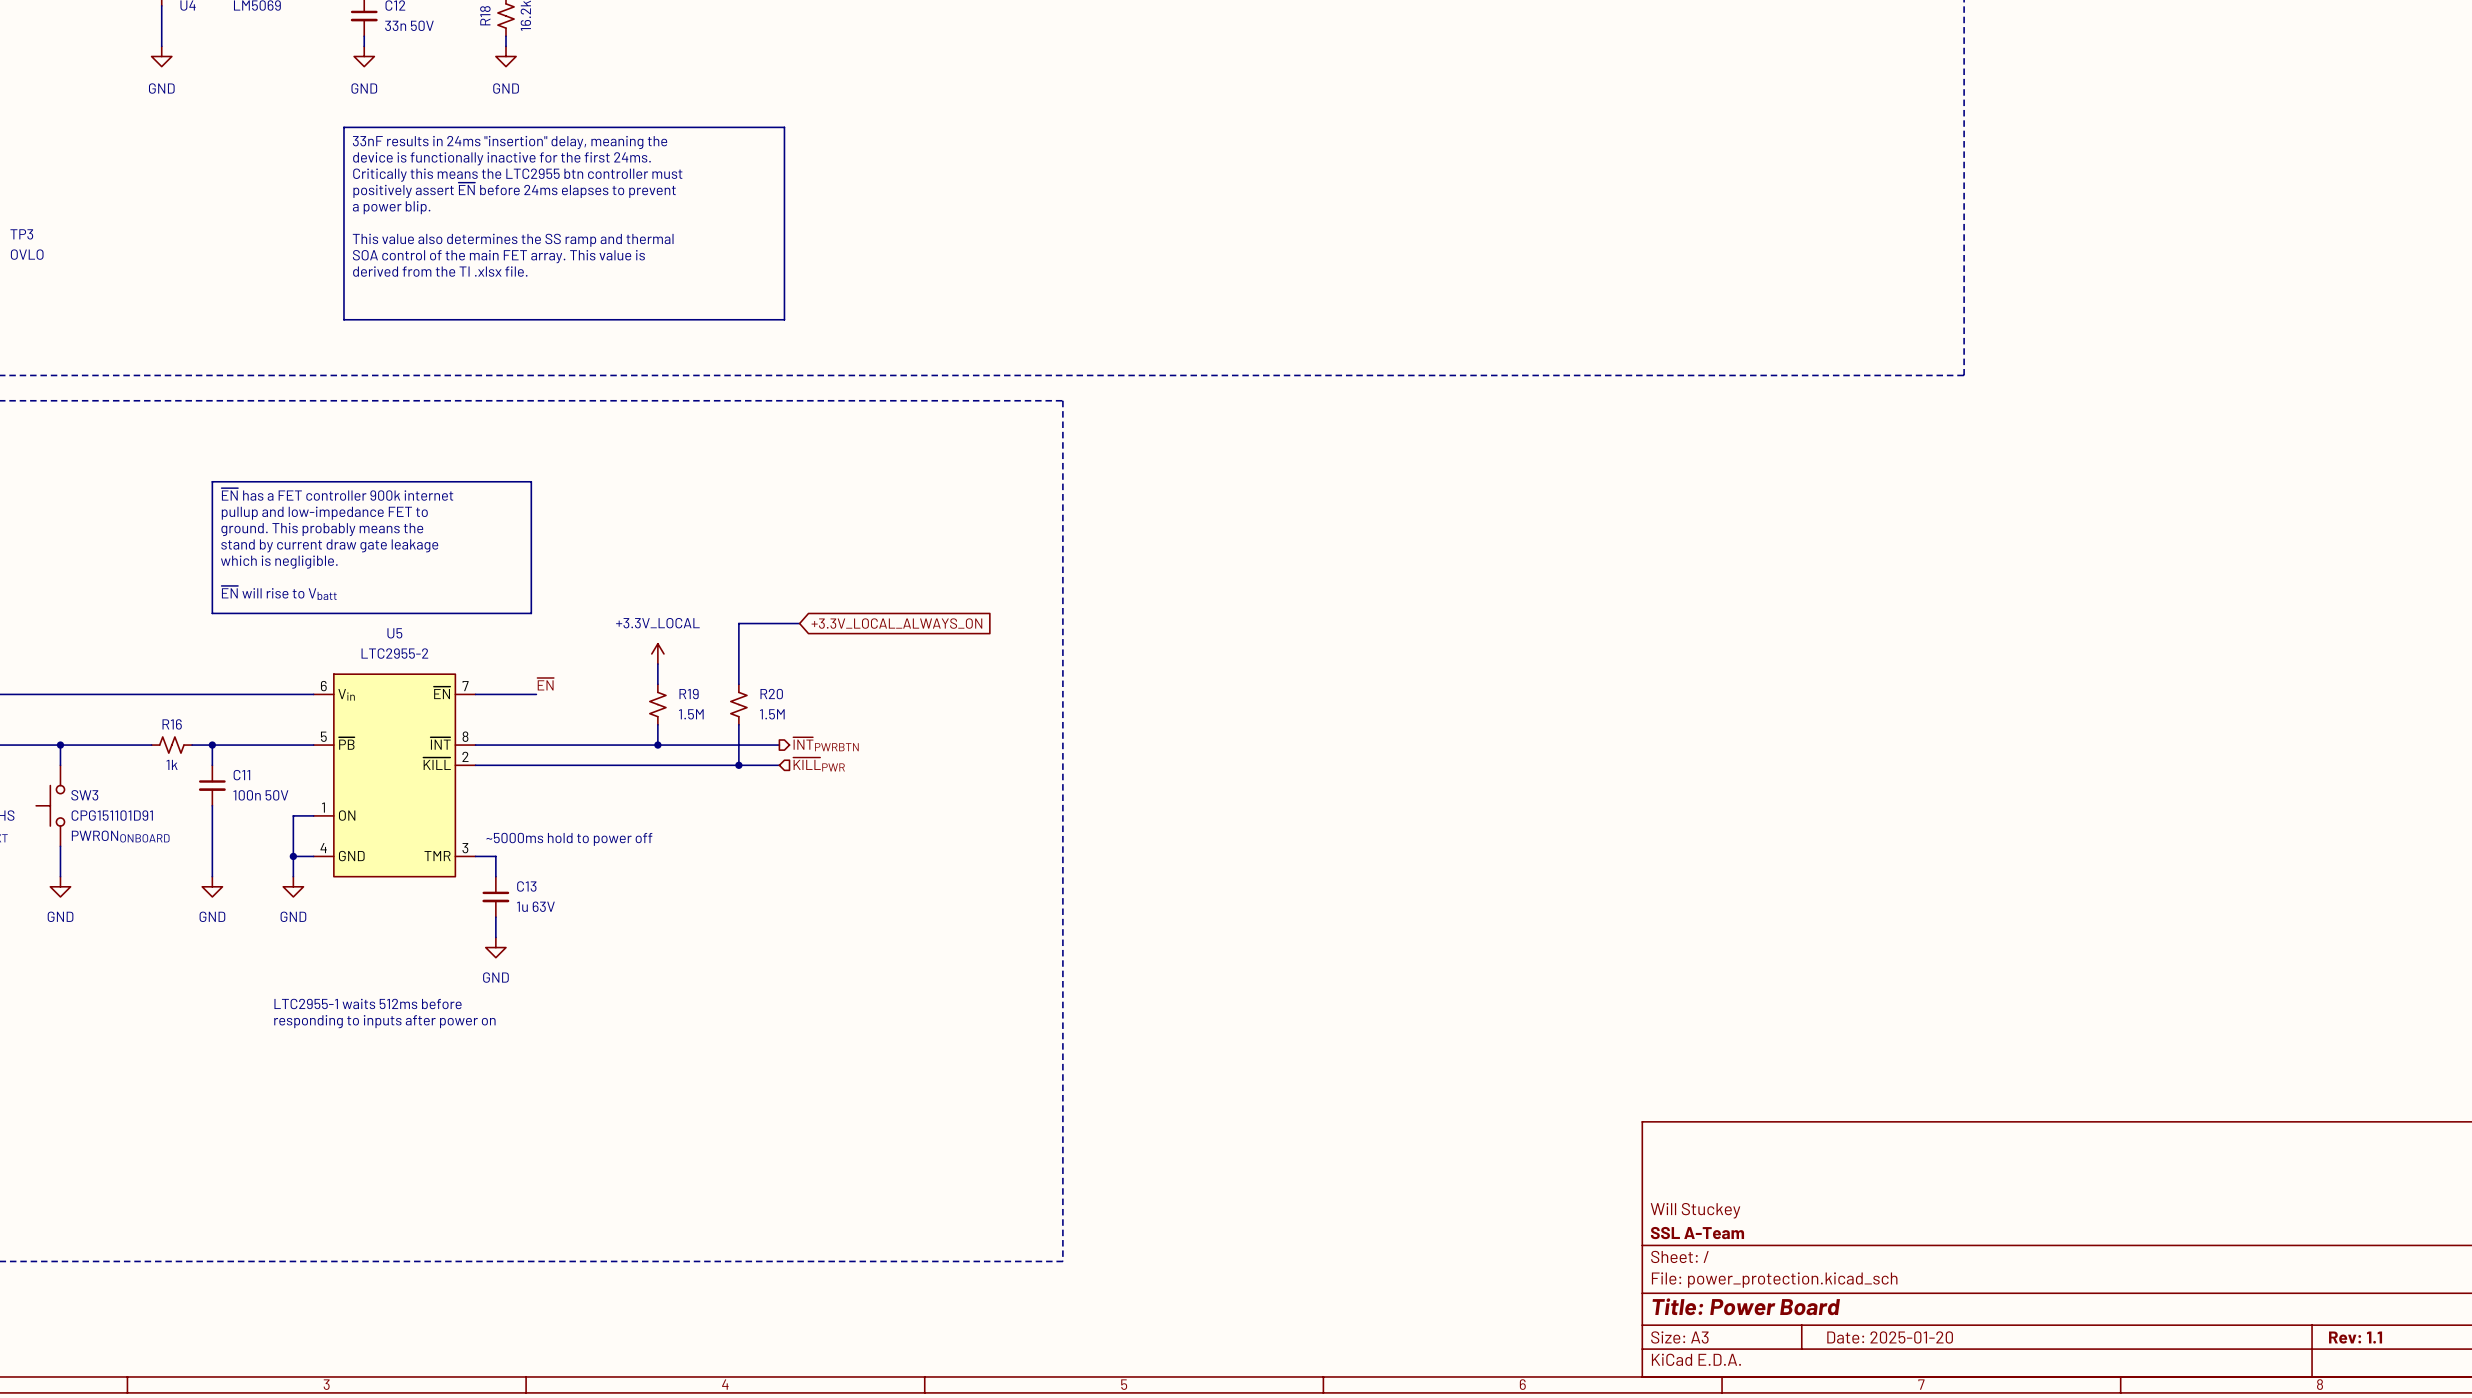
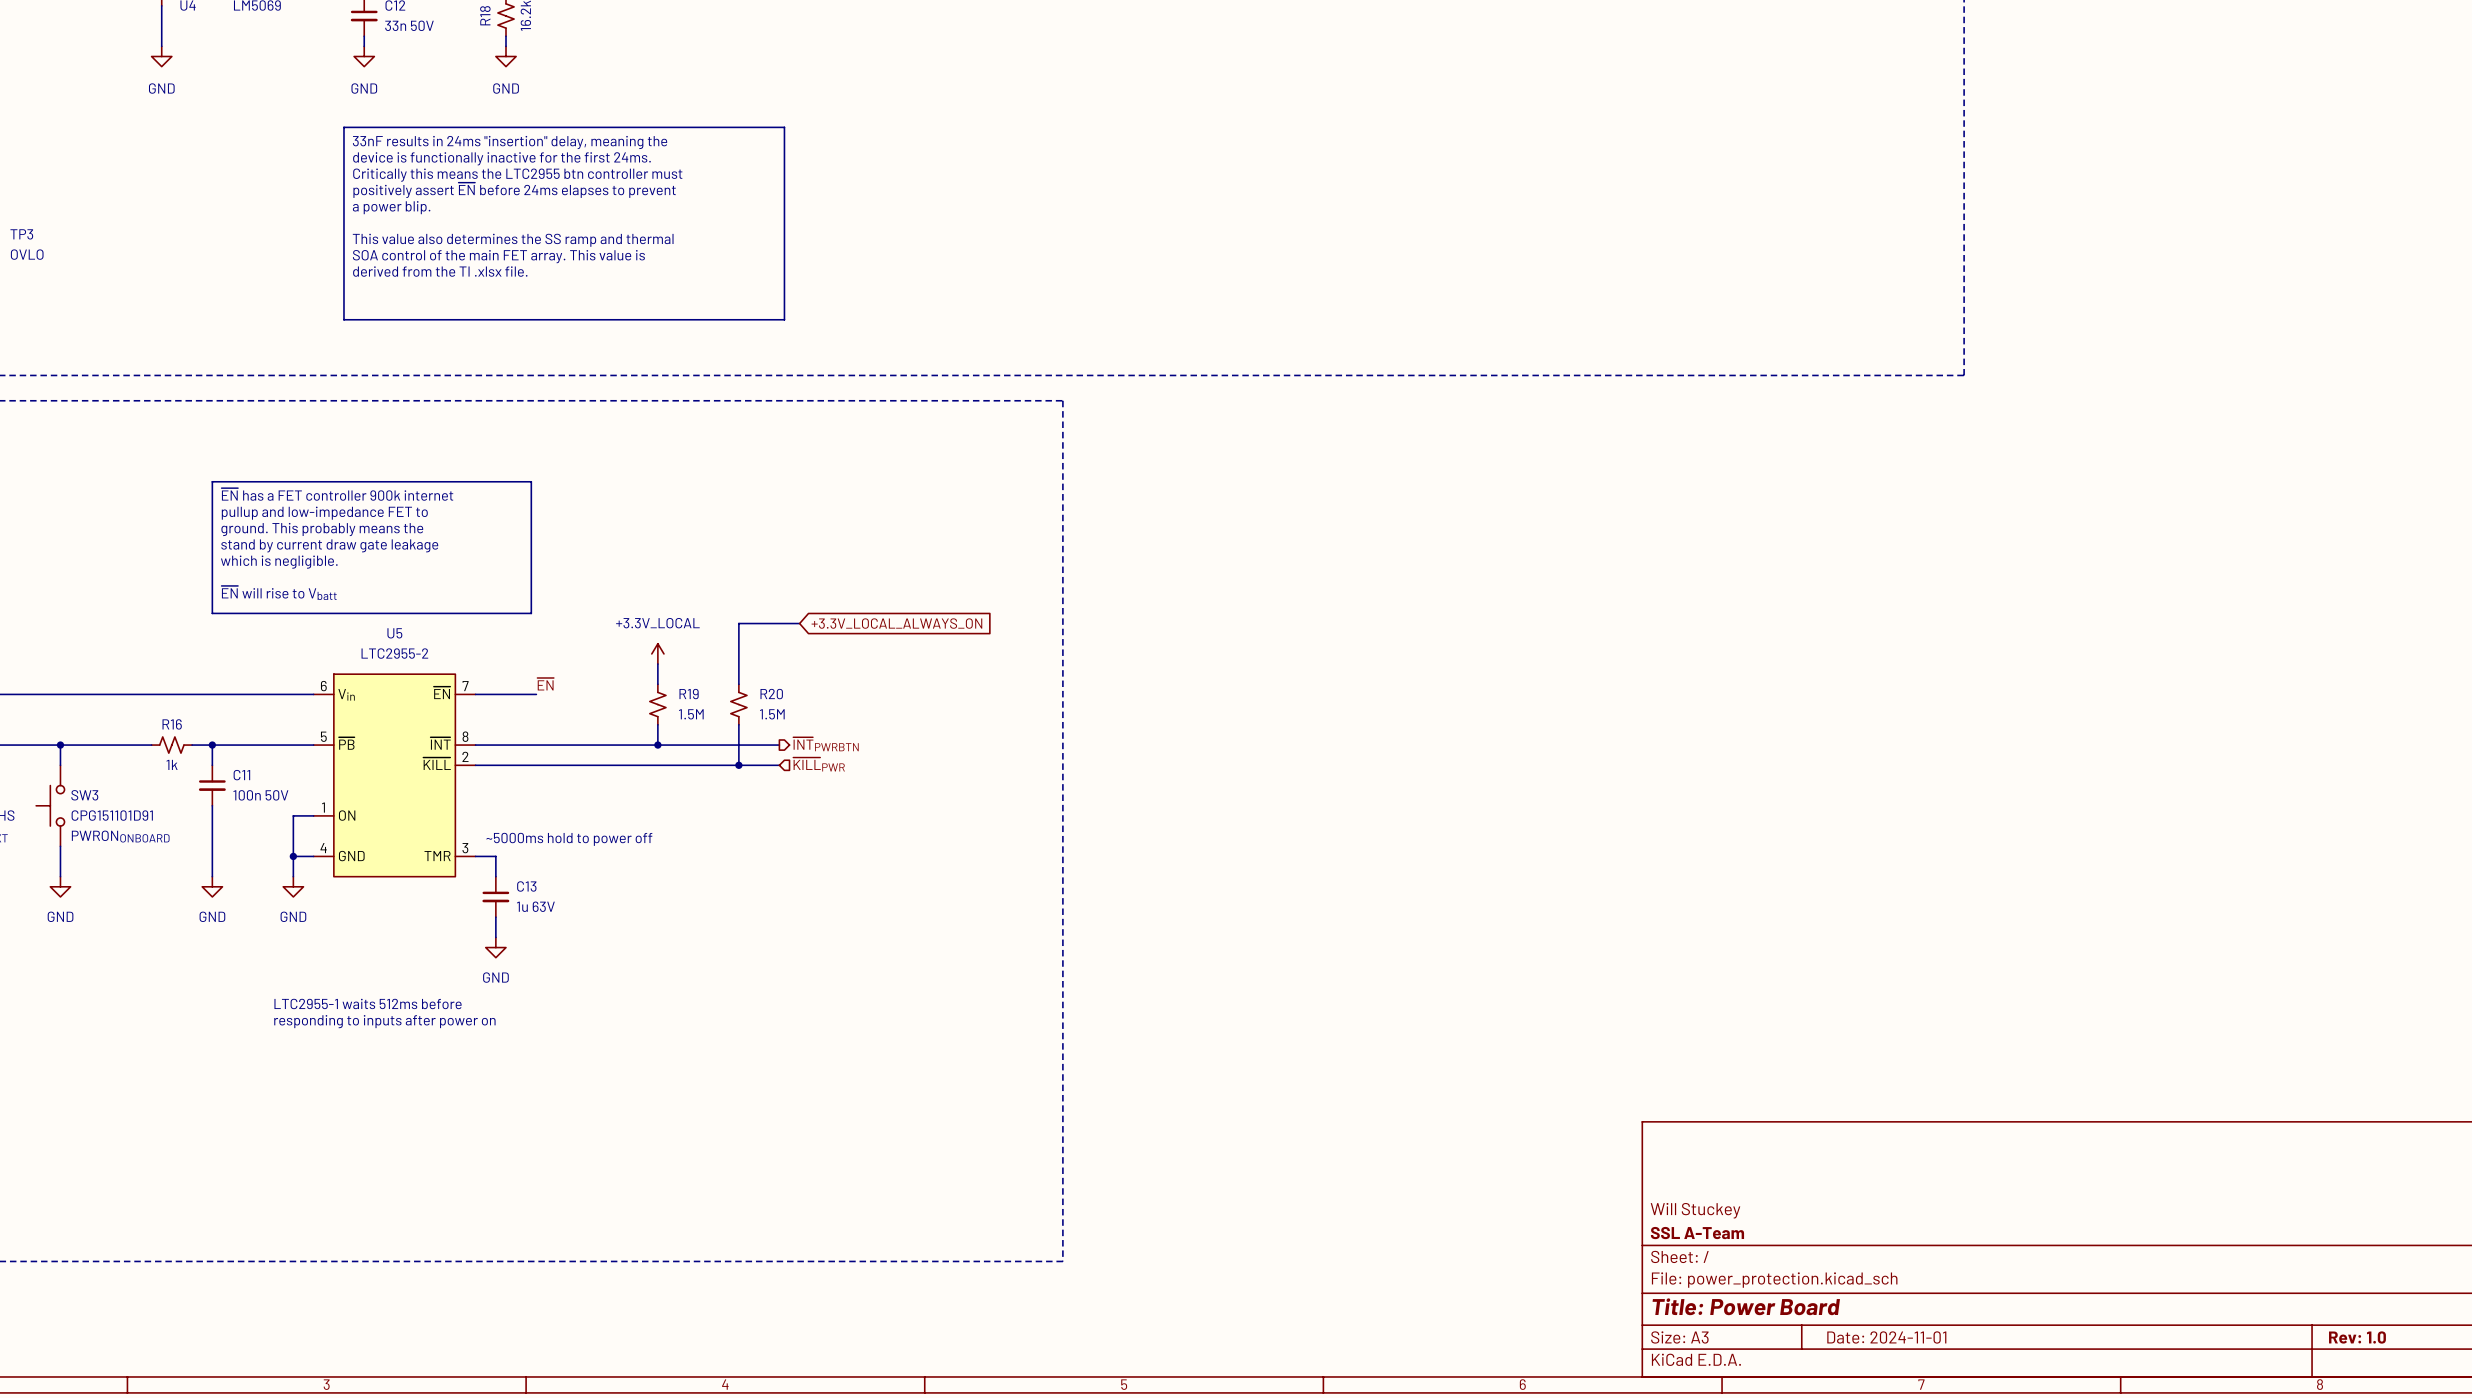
title block: Date: 2025-01-20 (1890, 1337) -> Date: 2024-11-01 (1886, 1337)
title block: Rev: 1.1 (2355, 1337) -> Rev: 1.0 (2357, 1337)

